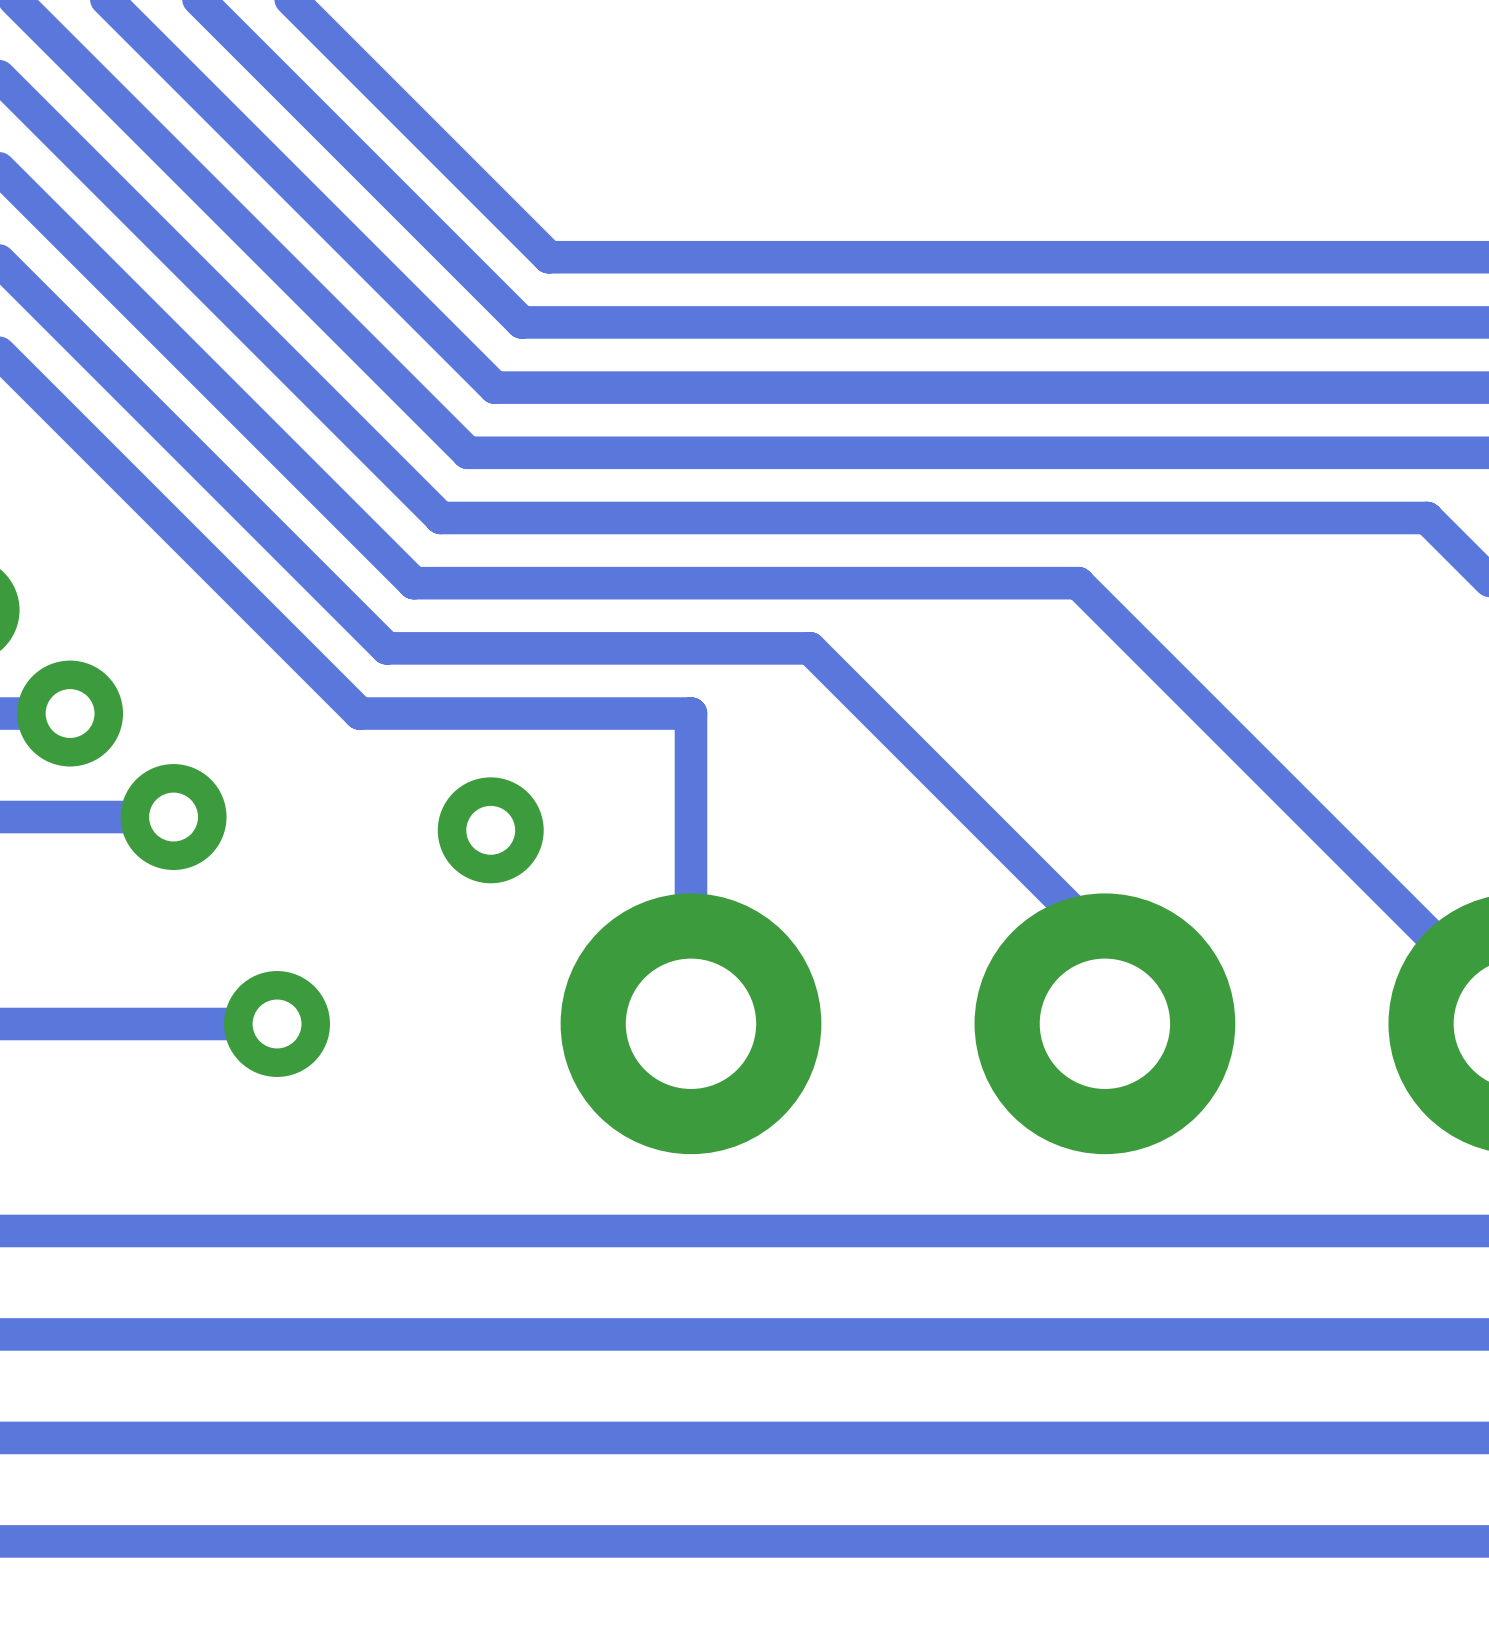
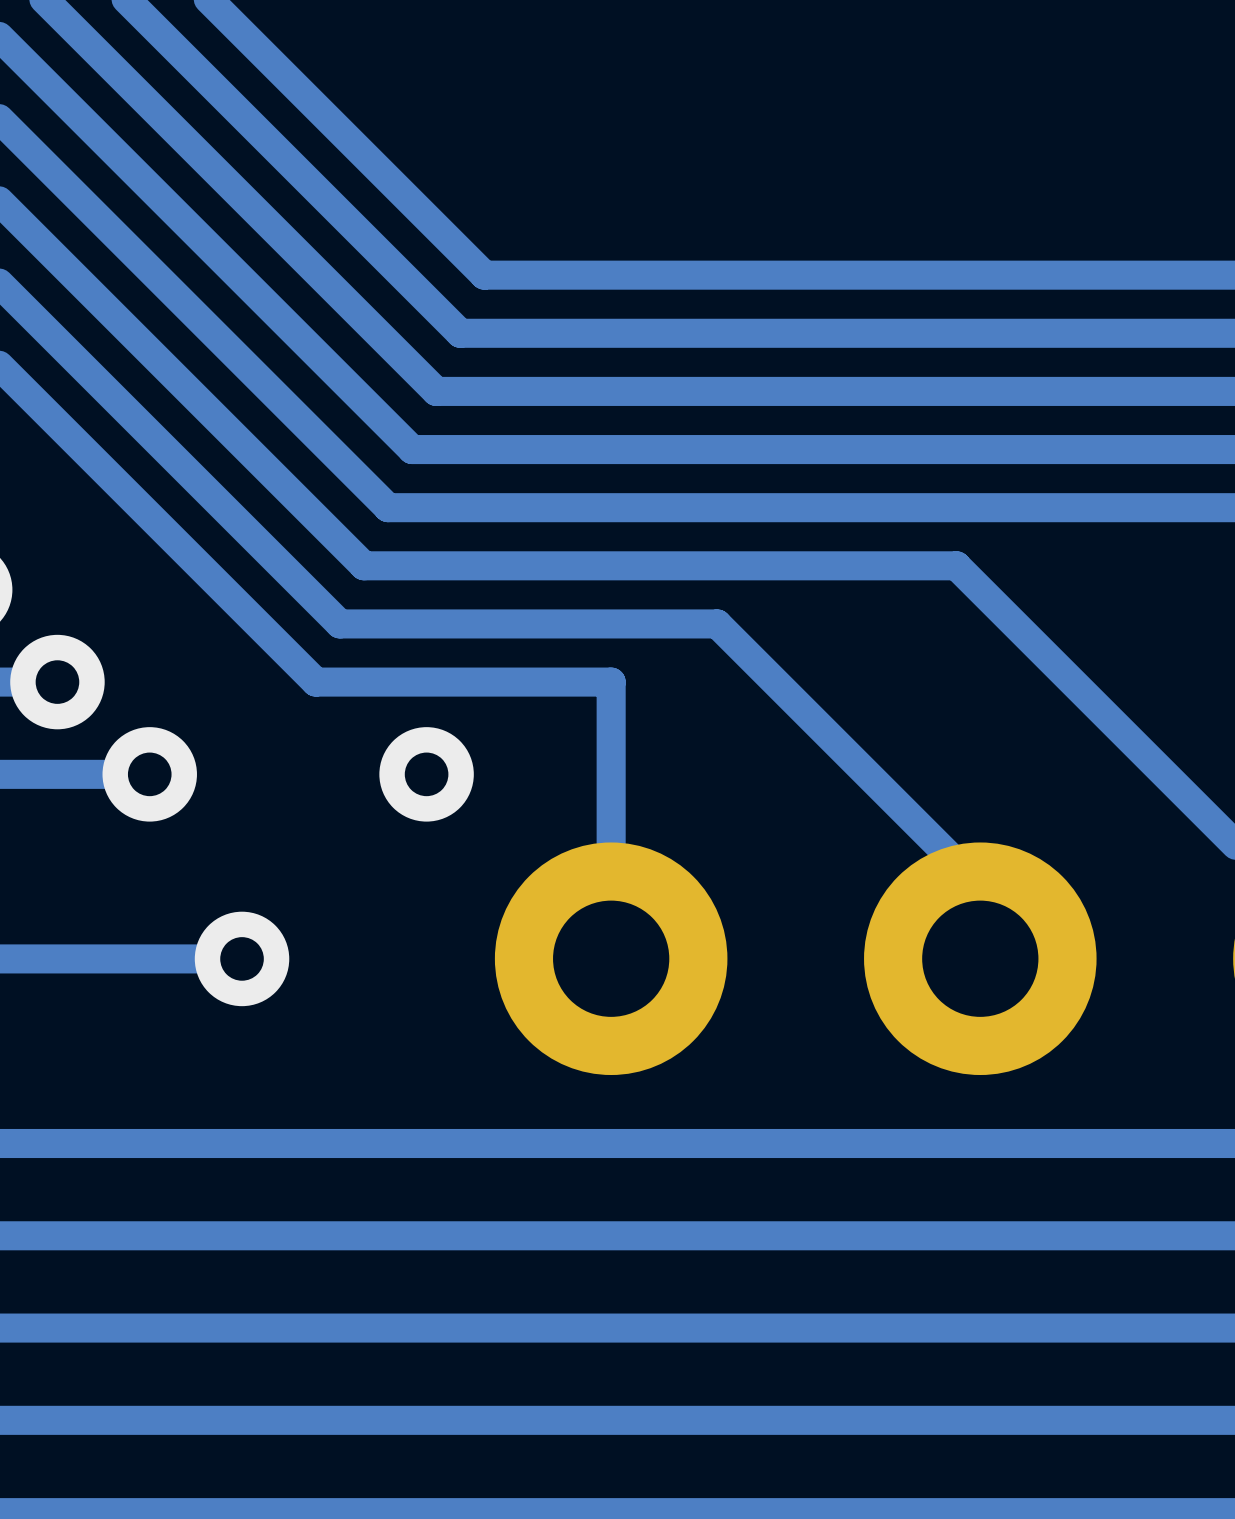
via position: (490, 830) -> (426, 774)

